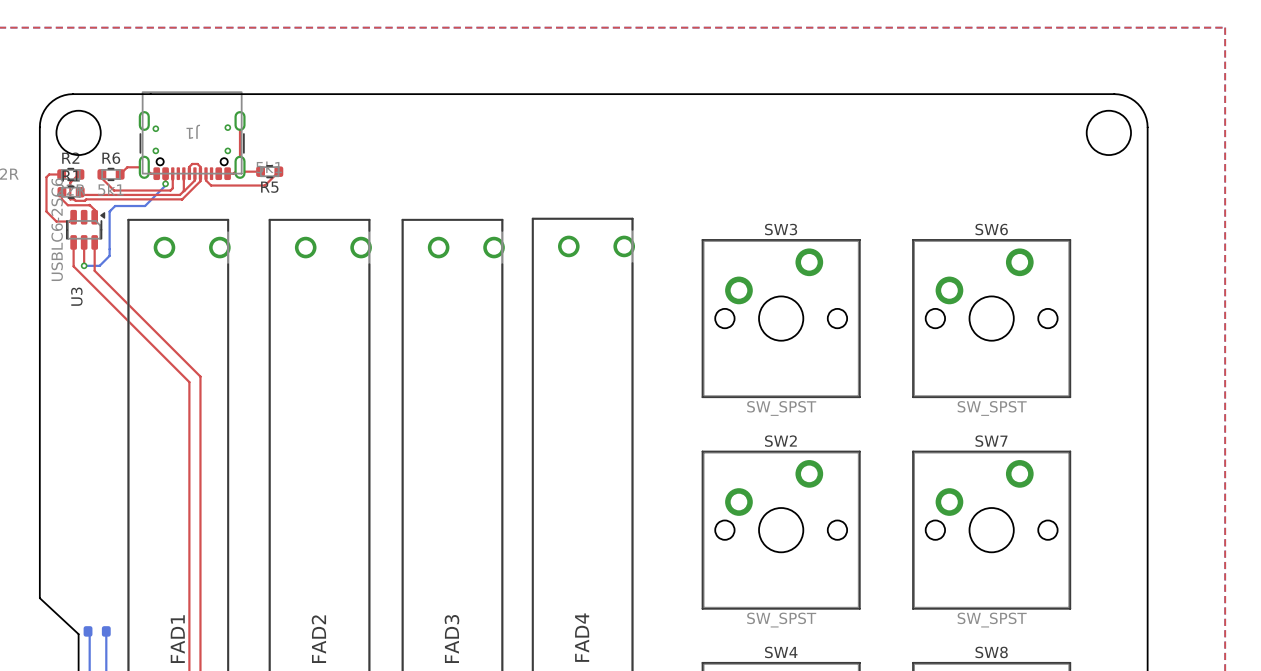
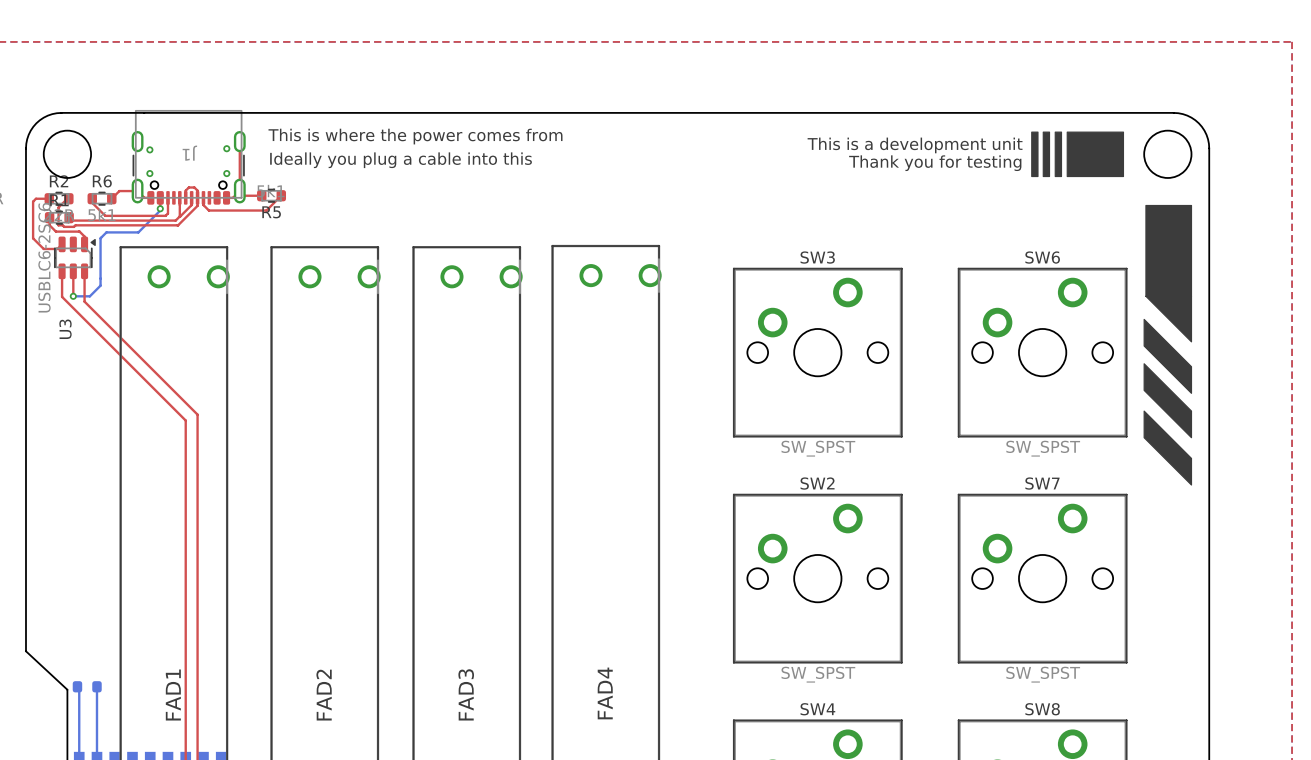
drawing: none -> [1031, 131, 1125, 178]
text: none -> This is where the power comes from (415, 136)
text: none -> This is a development unit (915, 145)
text: none -> Ideally you plug a cable into this (401, 160)
text: none -> Thank you for testing (935, 163)
drawing: none -> [1143, 204, 1193, 486]

